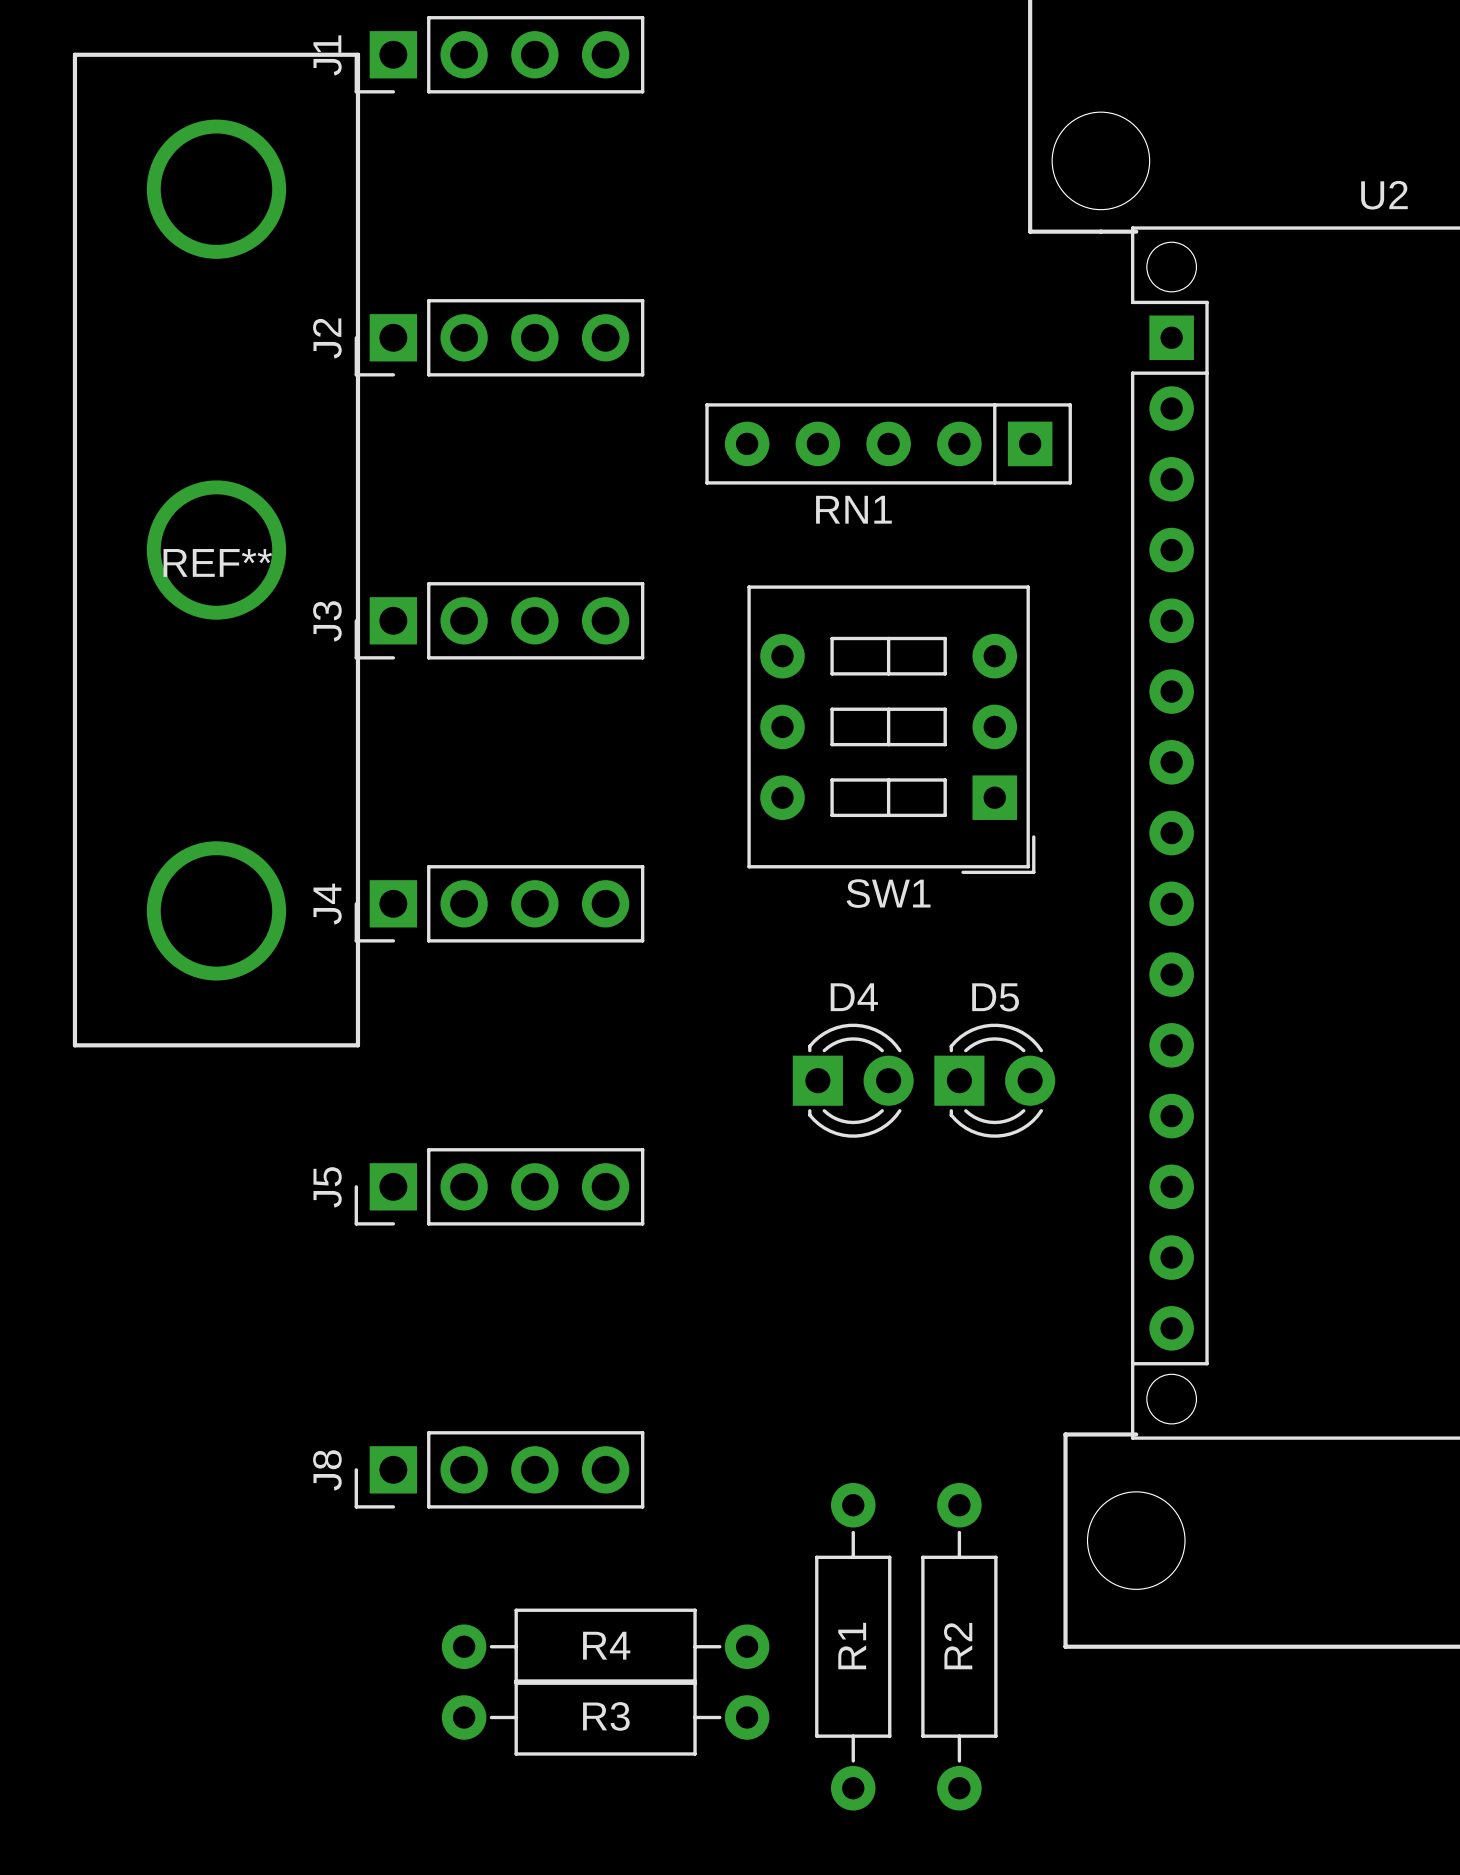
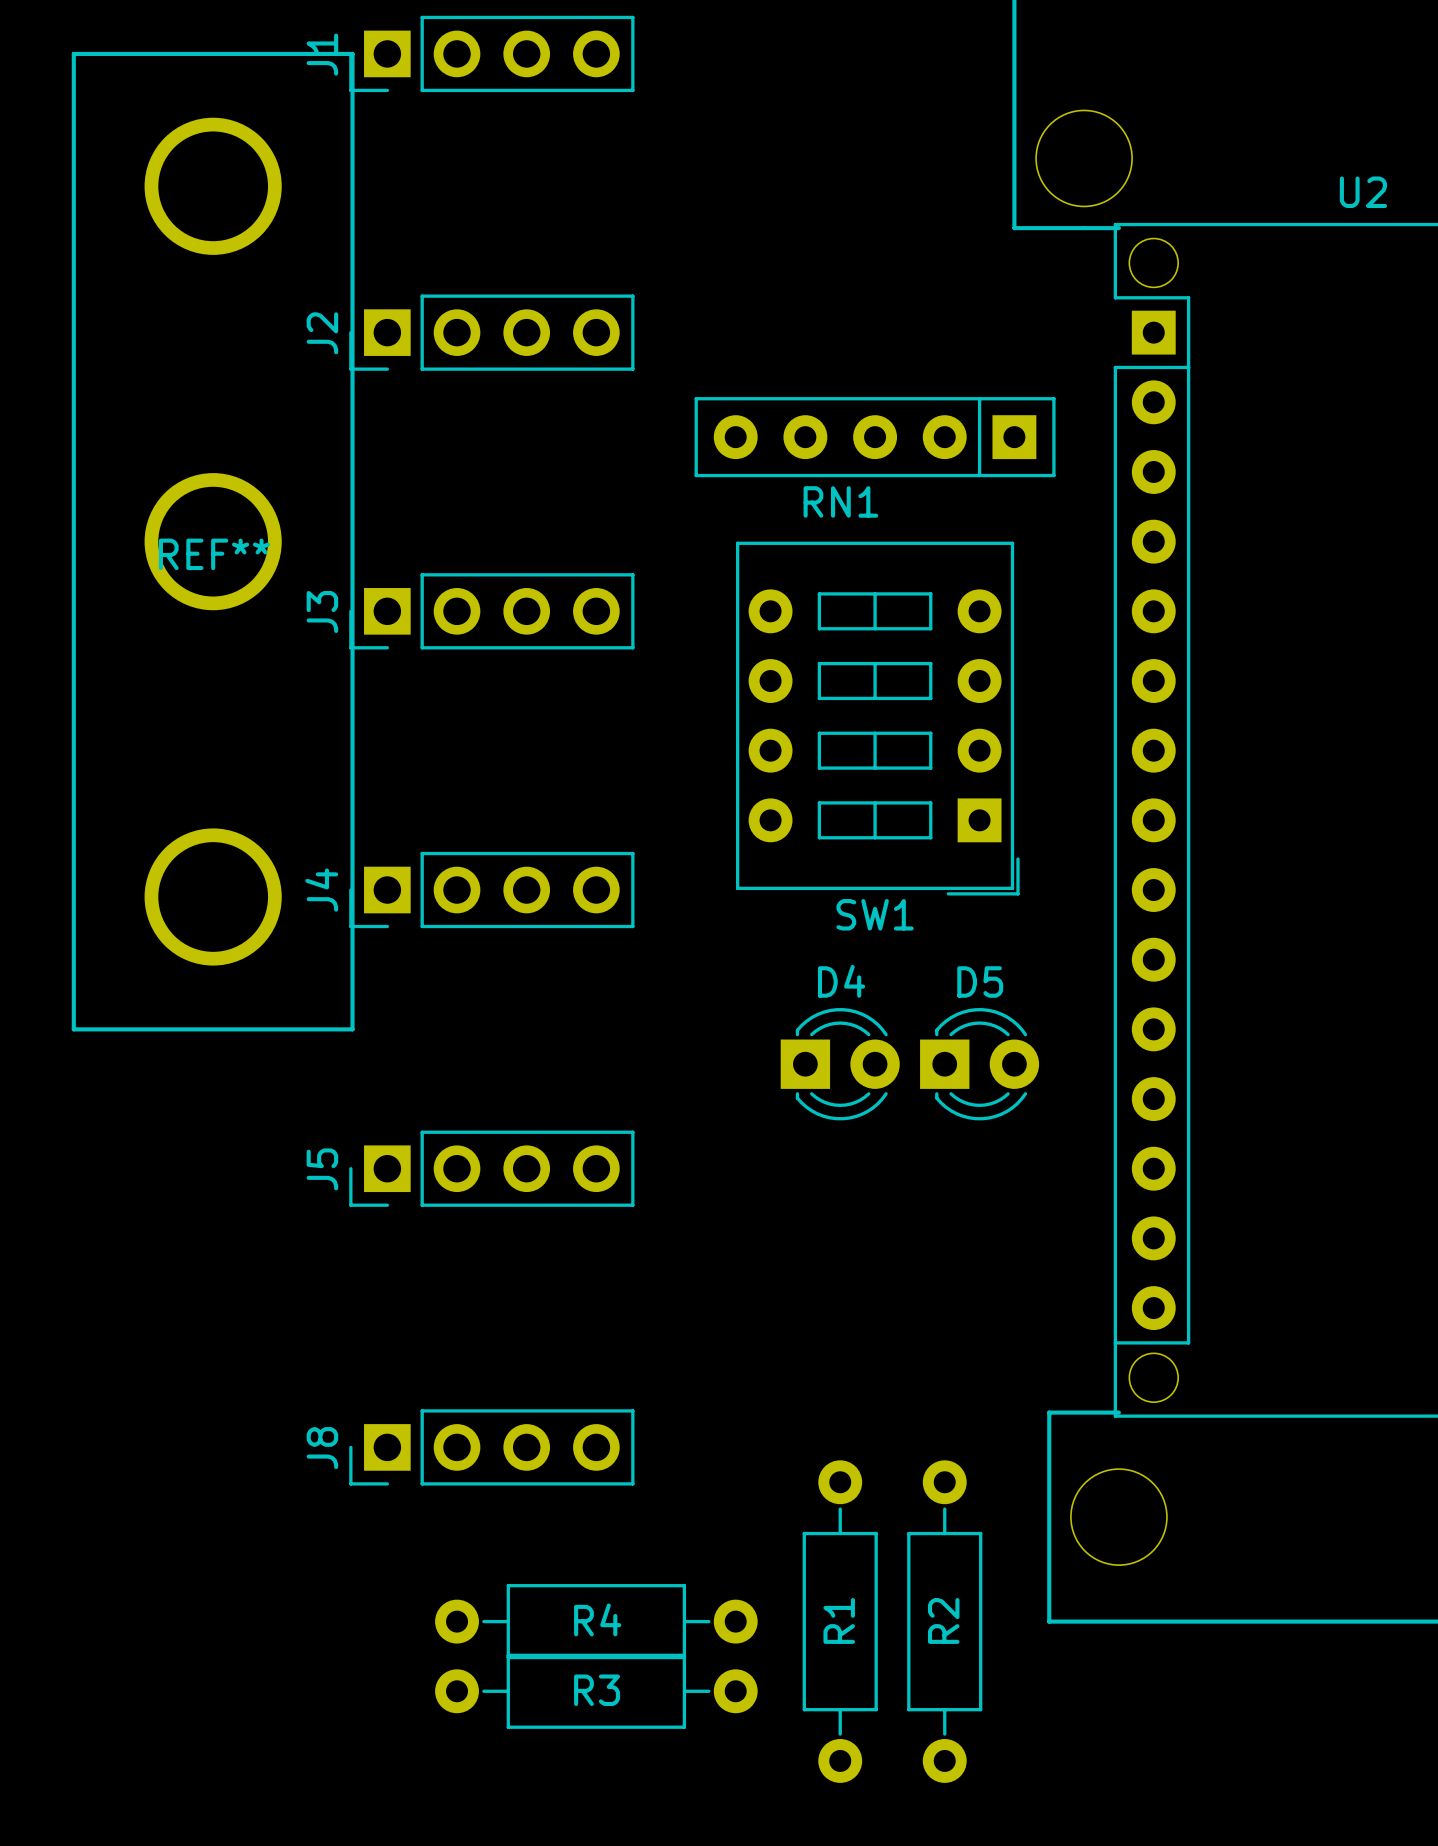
SW1 footprint: [747, 585, 1036, 875] -> [735, 541, 1020, 896]

